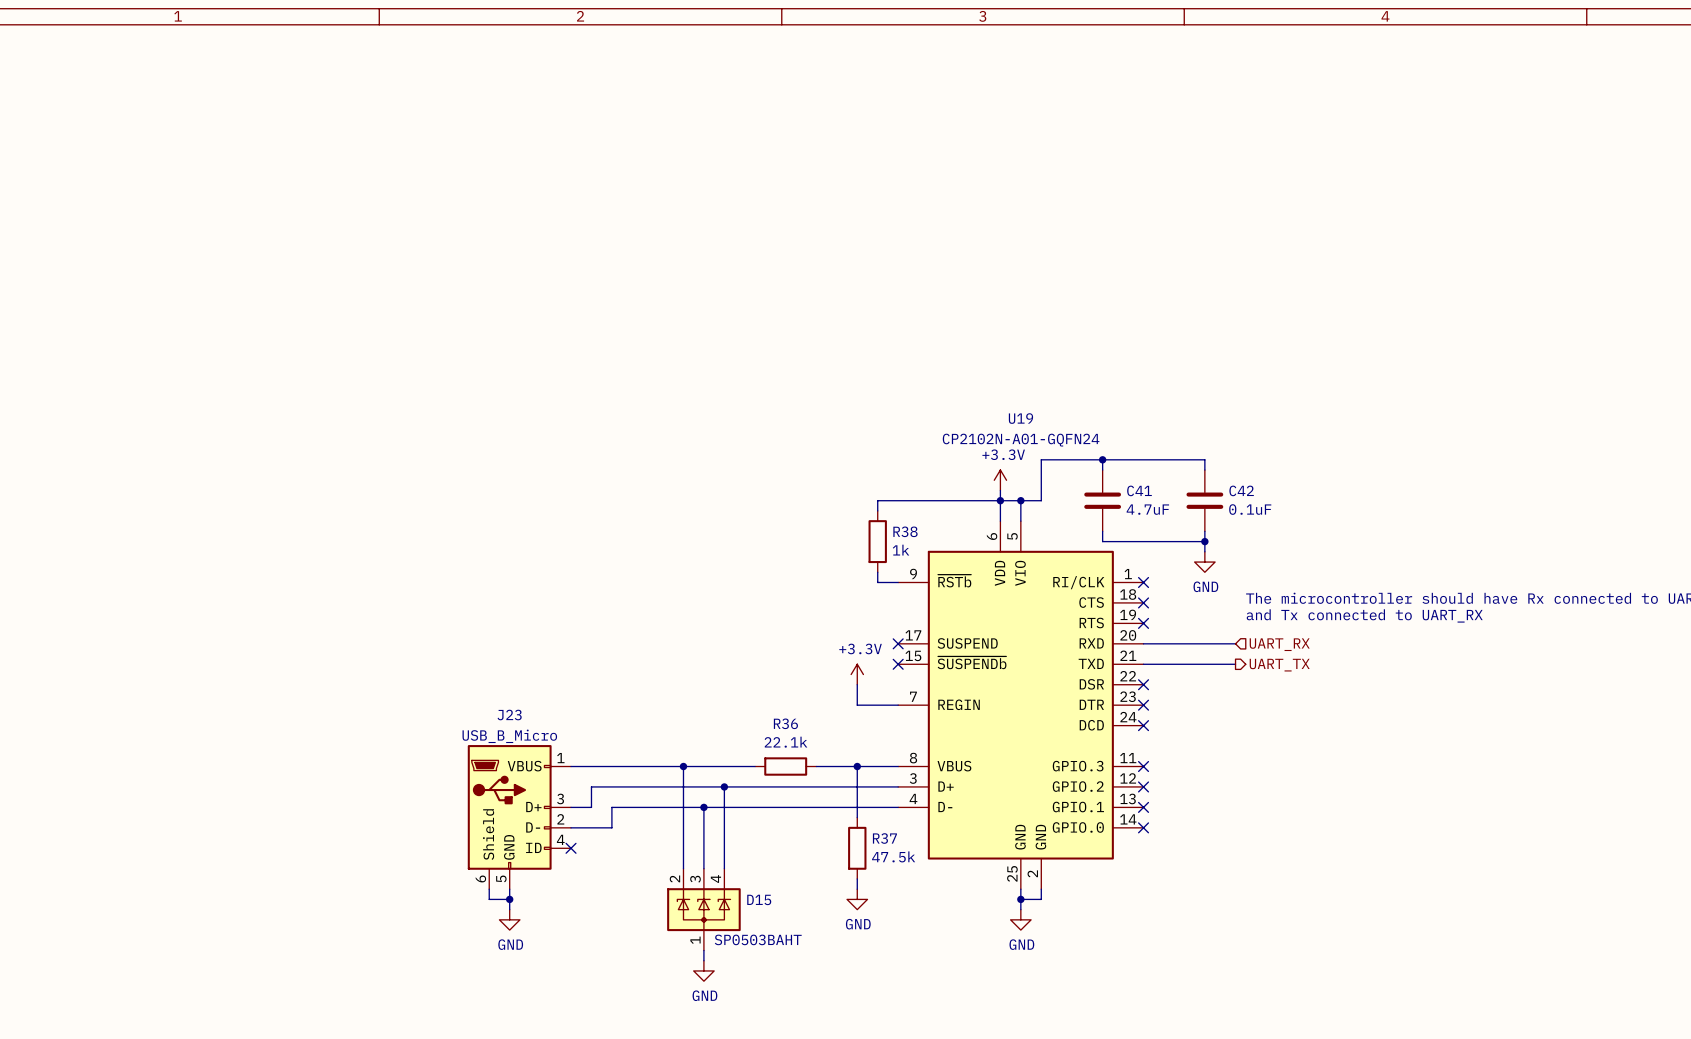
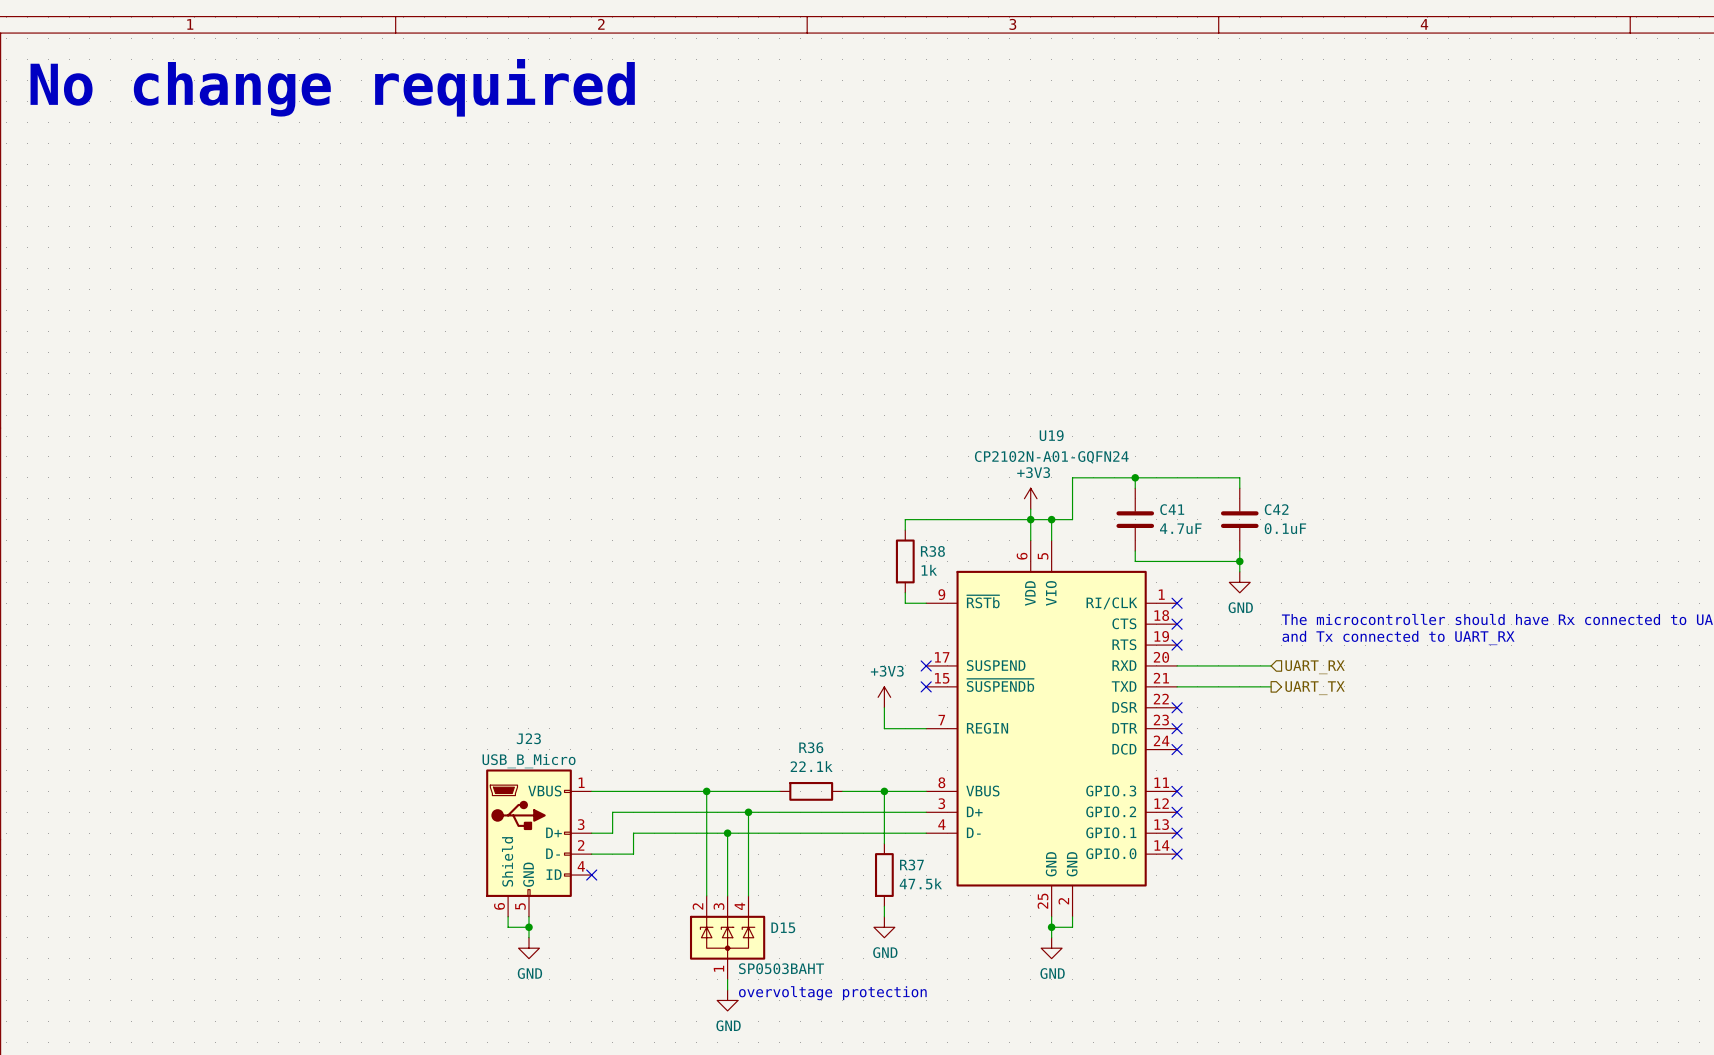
text: none -> No change required (332, 87)
power symbol: +3.3V (1000, 480) -> +3V3 (1030, 498)
power symbol: +3.3V (857, 674) -> +3V3 (884, 697)
text: none -> overvoltage protection (832, 993)

